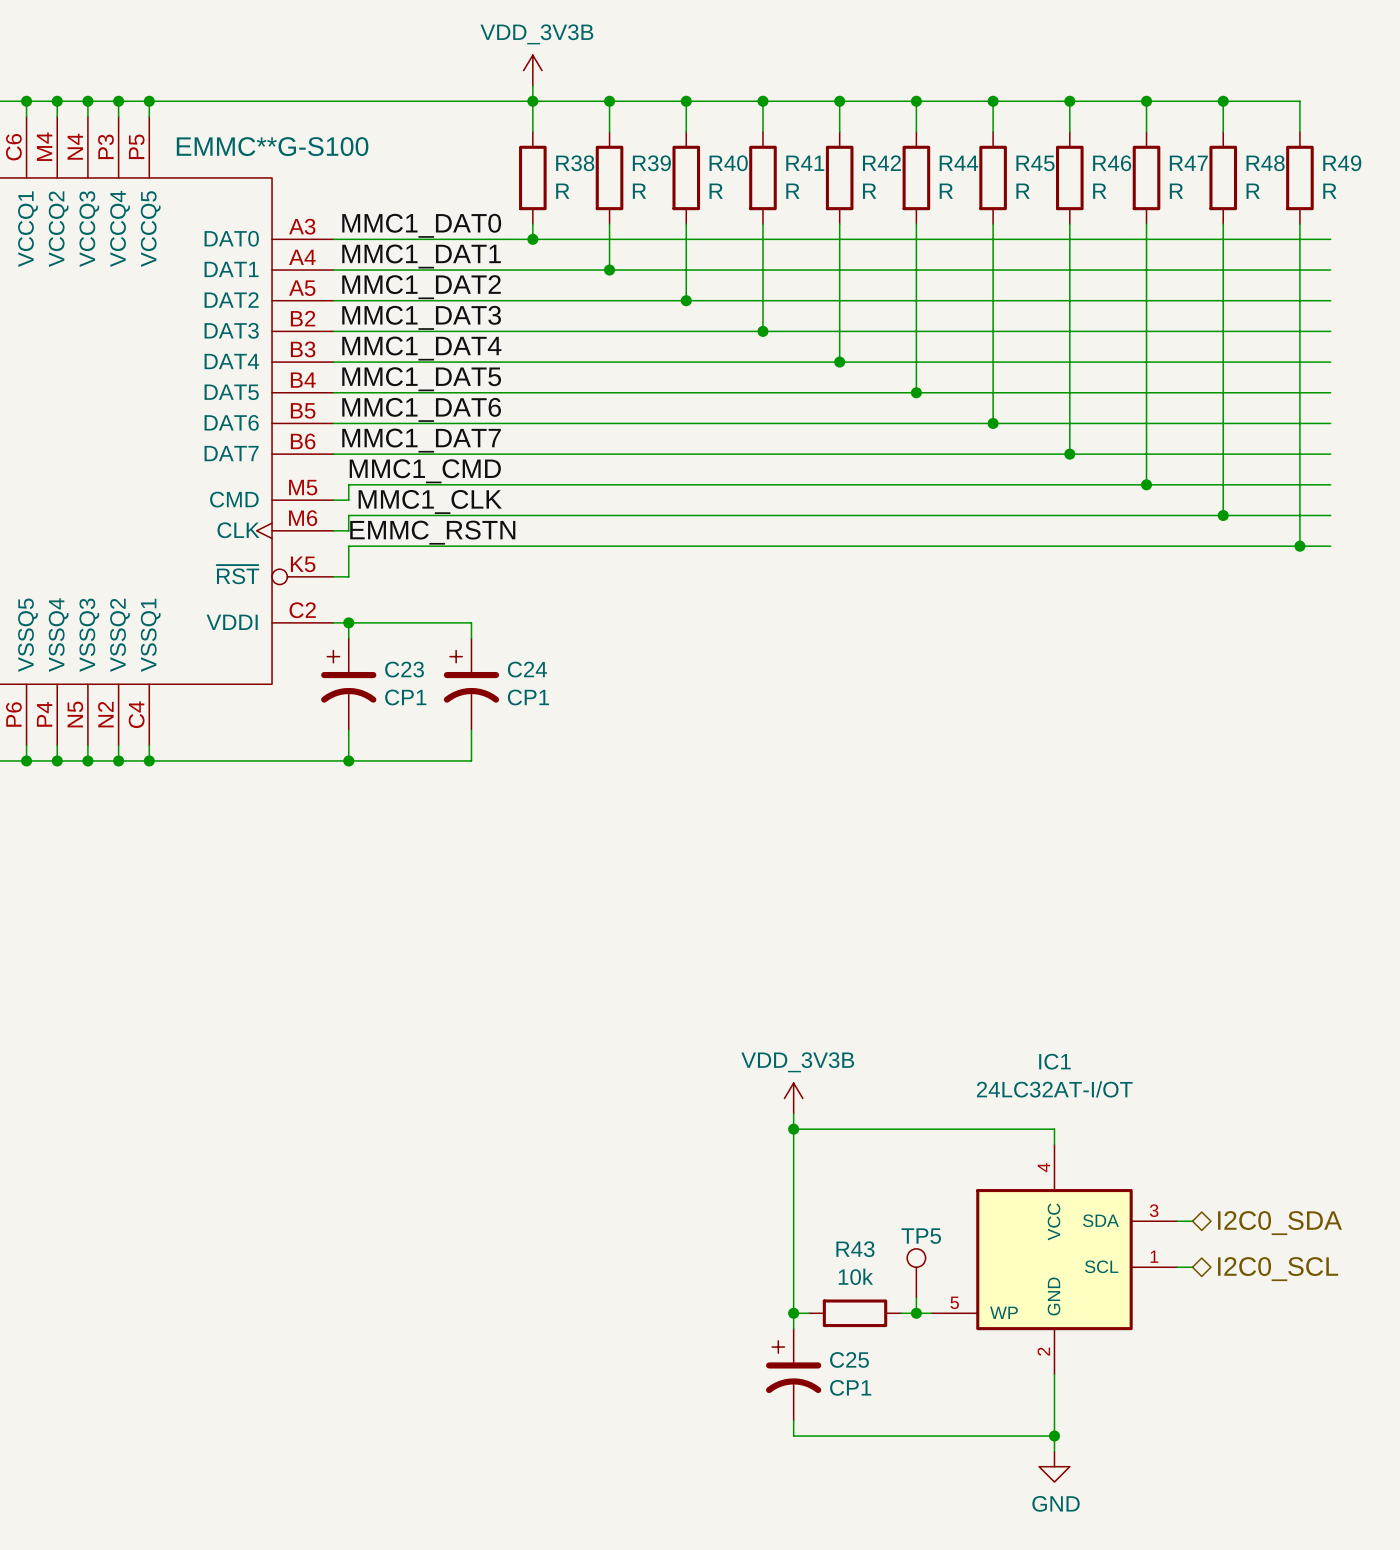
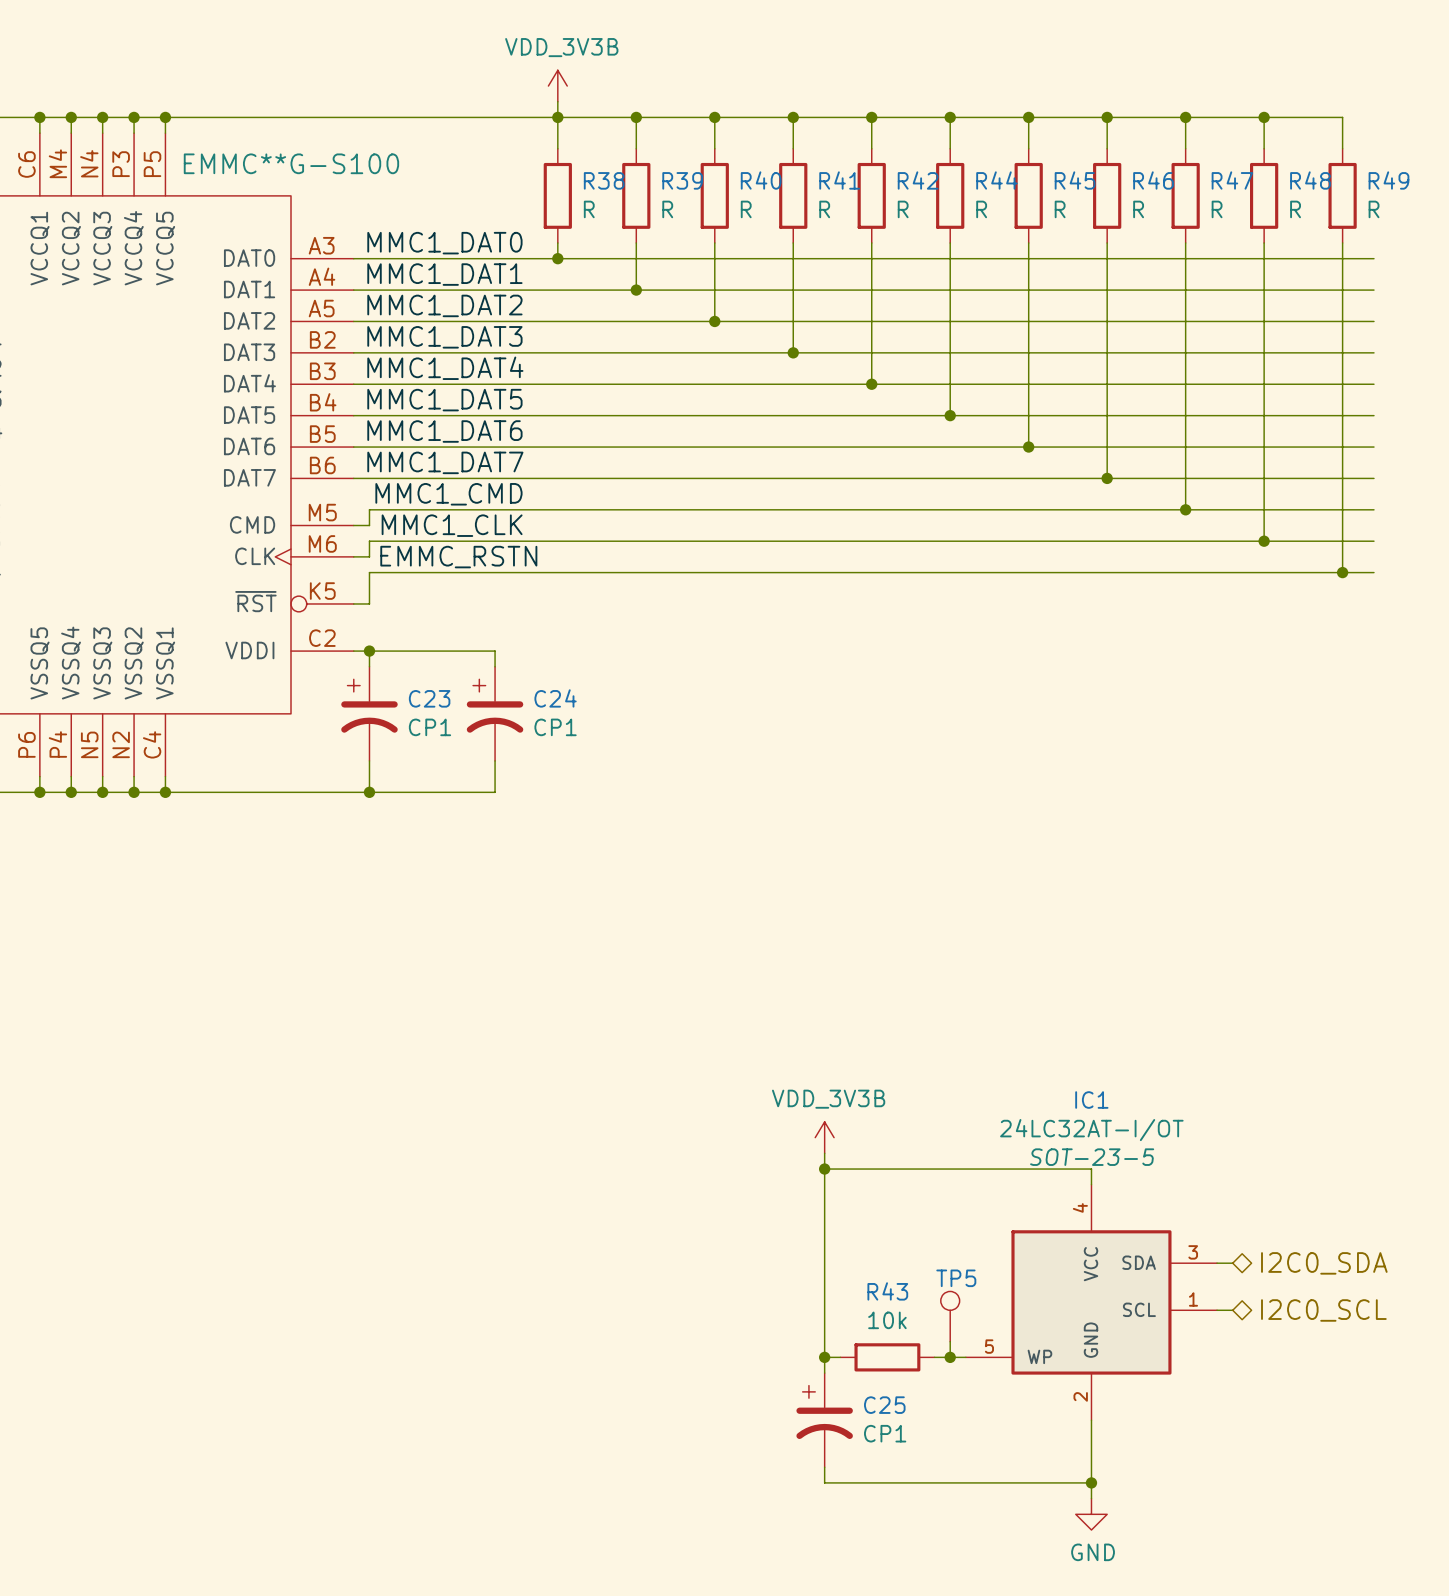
IC1 text: none -> SOT-23-5 (1092, 1157)

